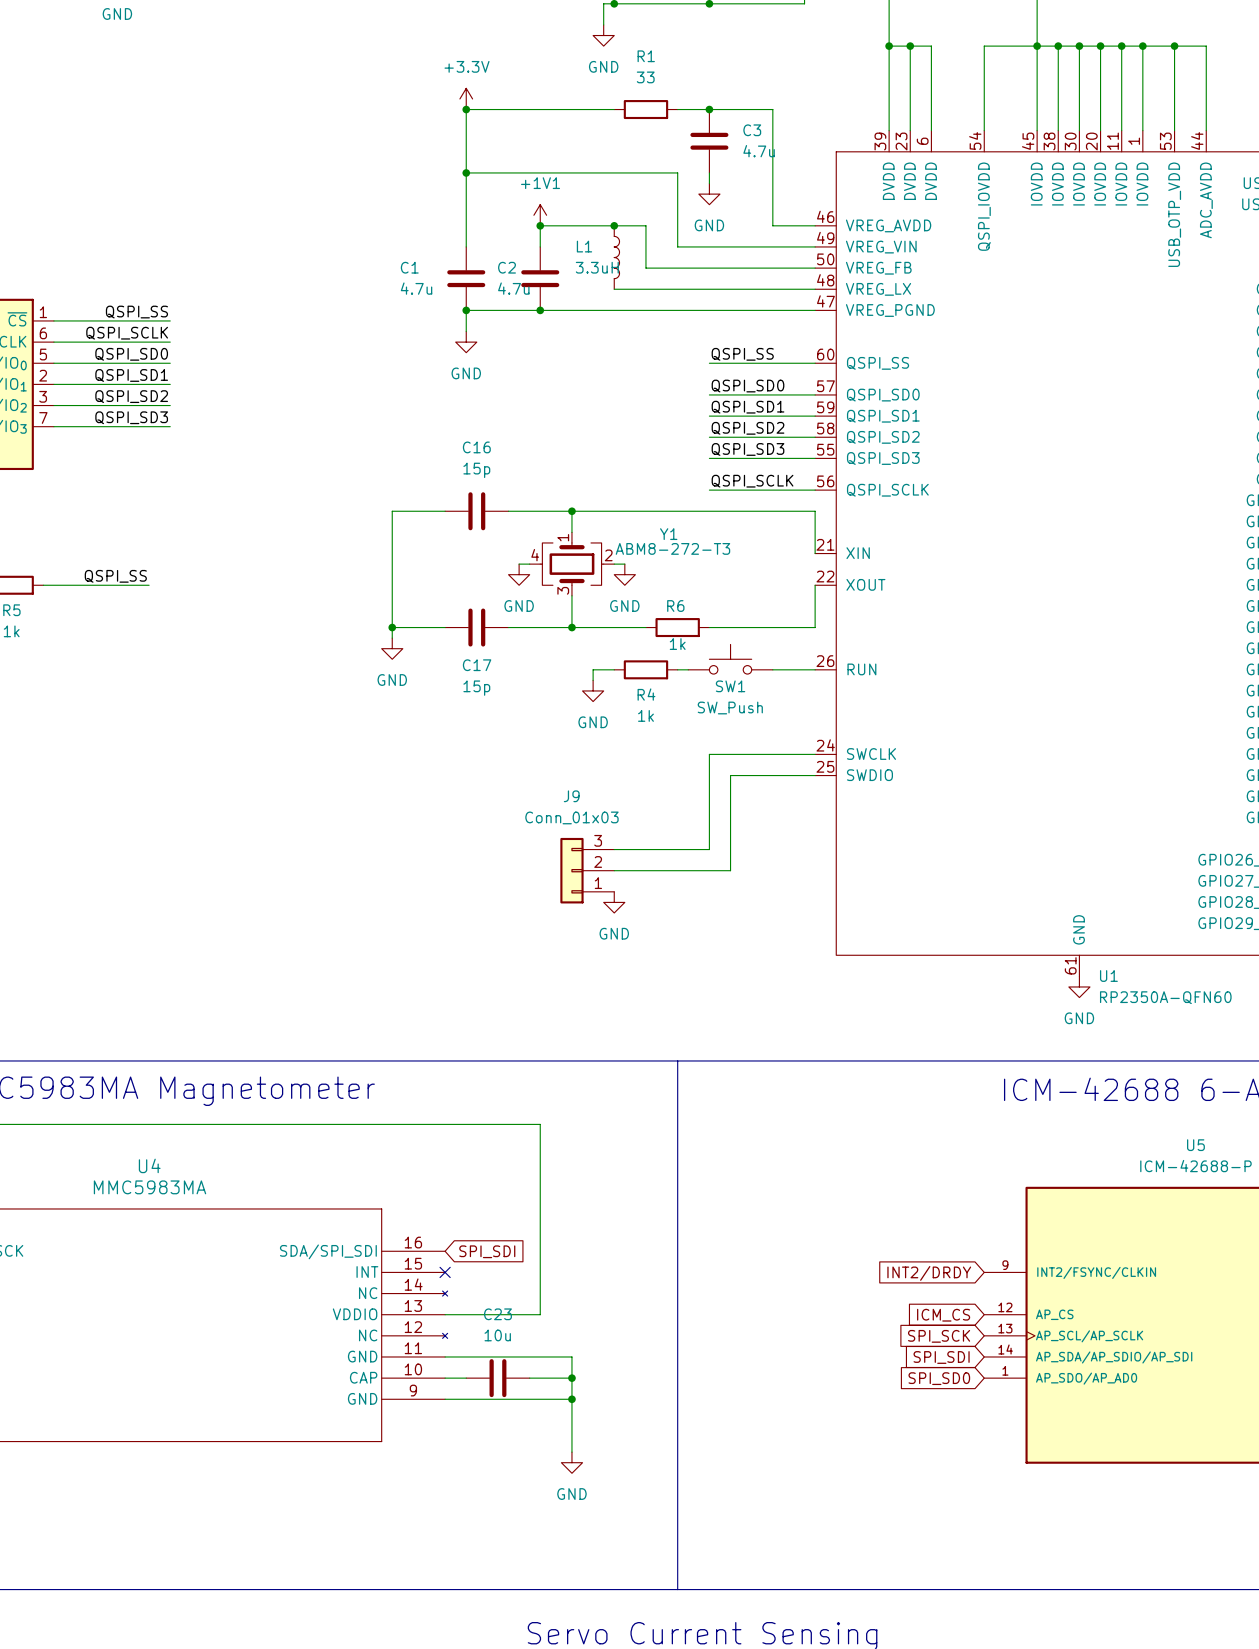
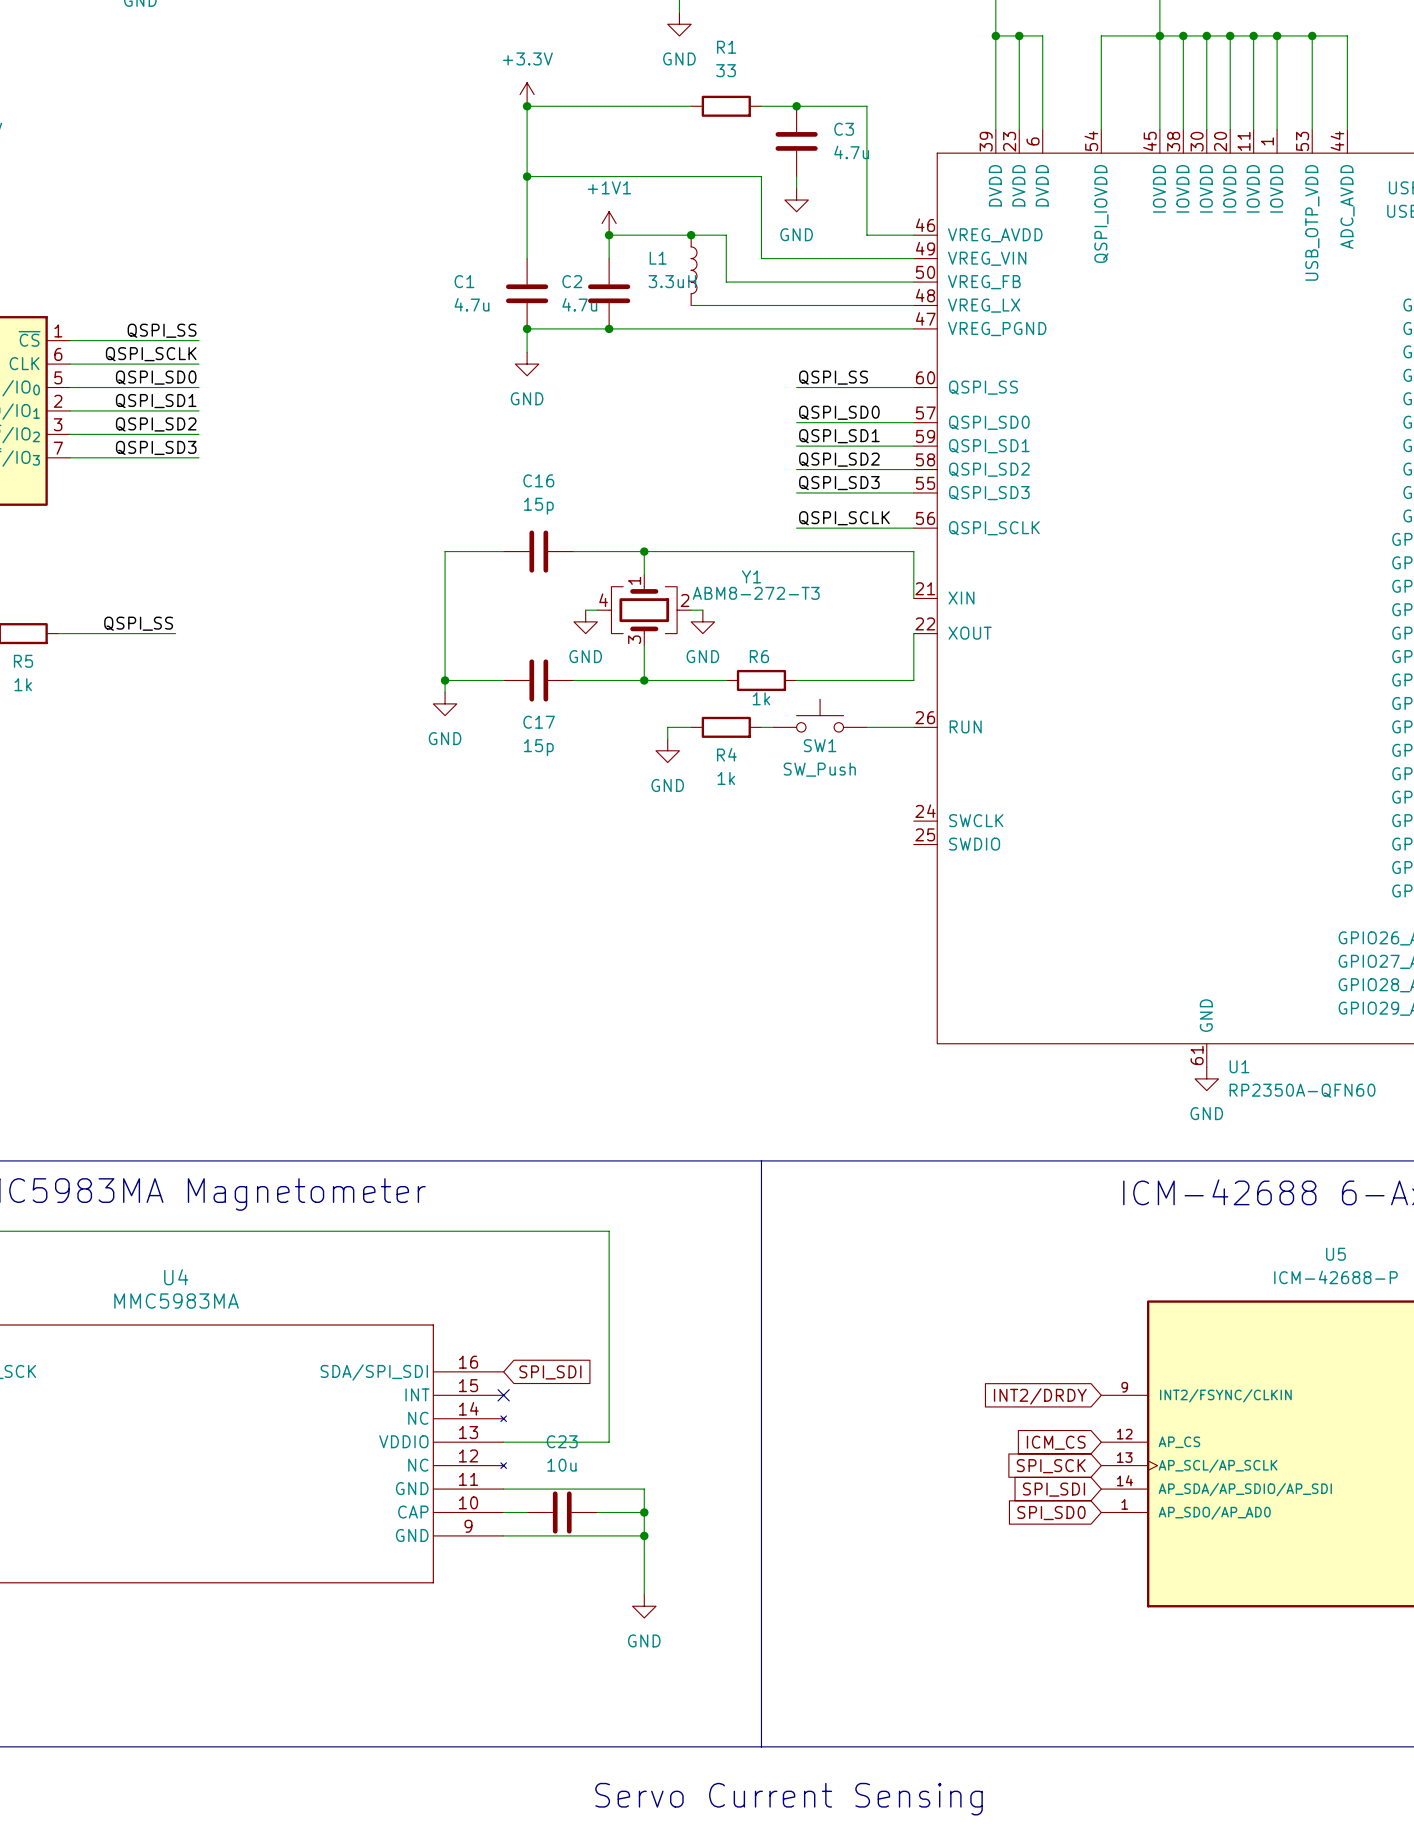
wire: (815, 754) (709, 754) (709, 849) (614, 849) -> none
wire: (815, 775) (730, 775) (730, 870) (614, 870) -> none
J9: Conn_01x03 (587, 870) -> none
power symbol: GND (614, 902) -> none

